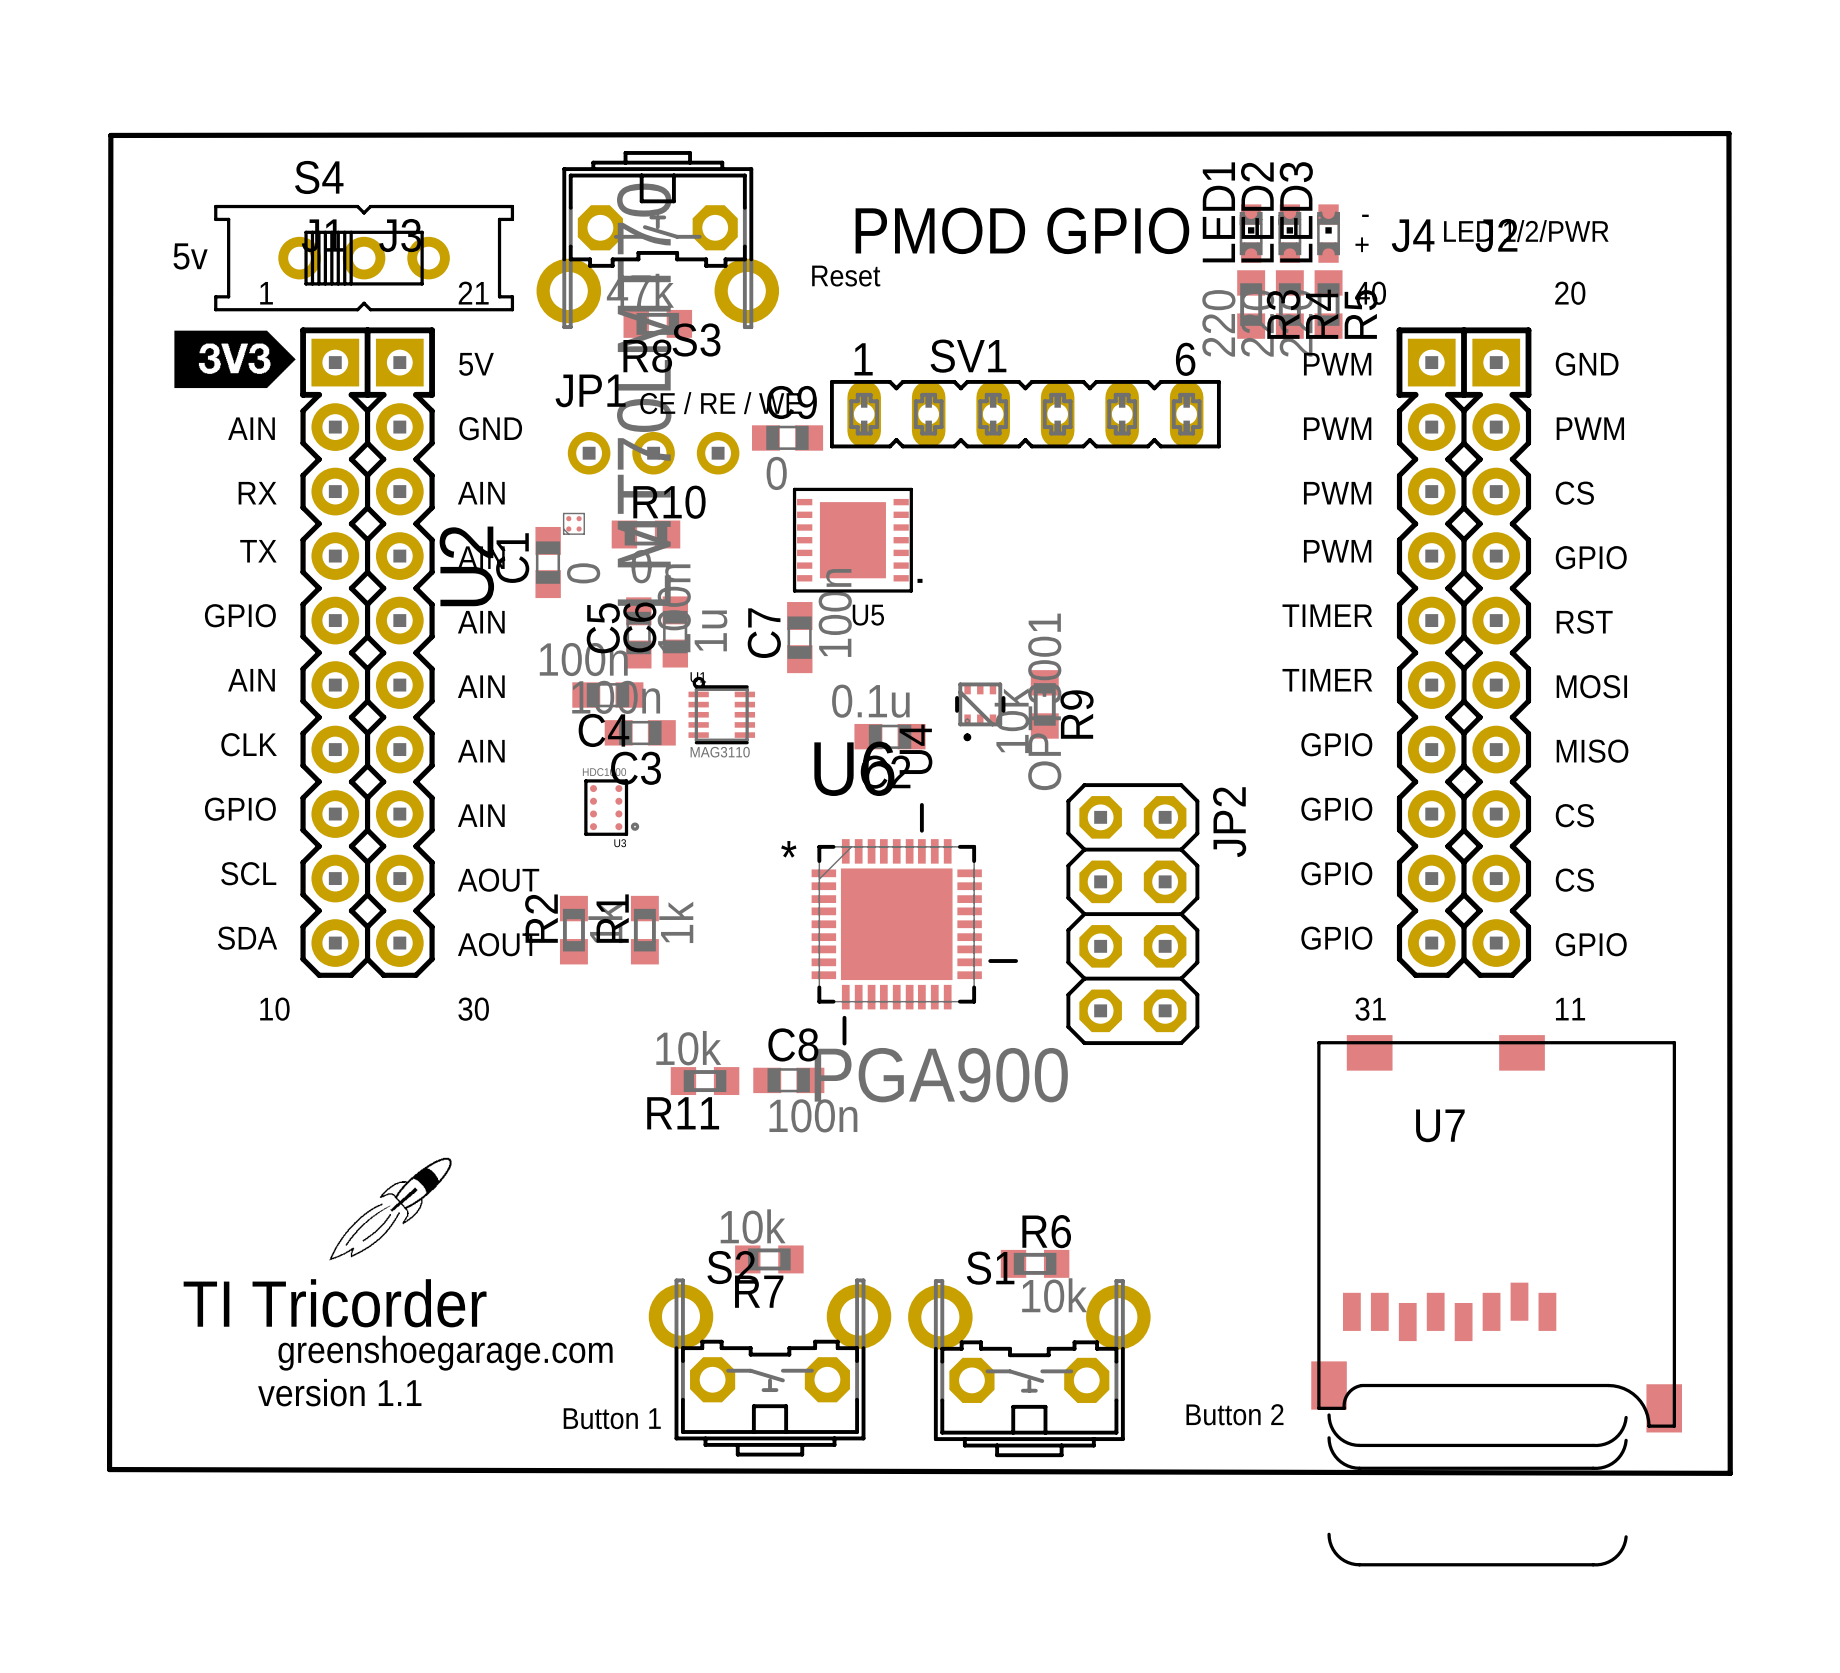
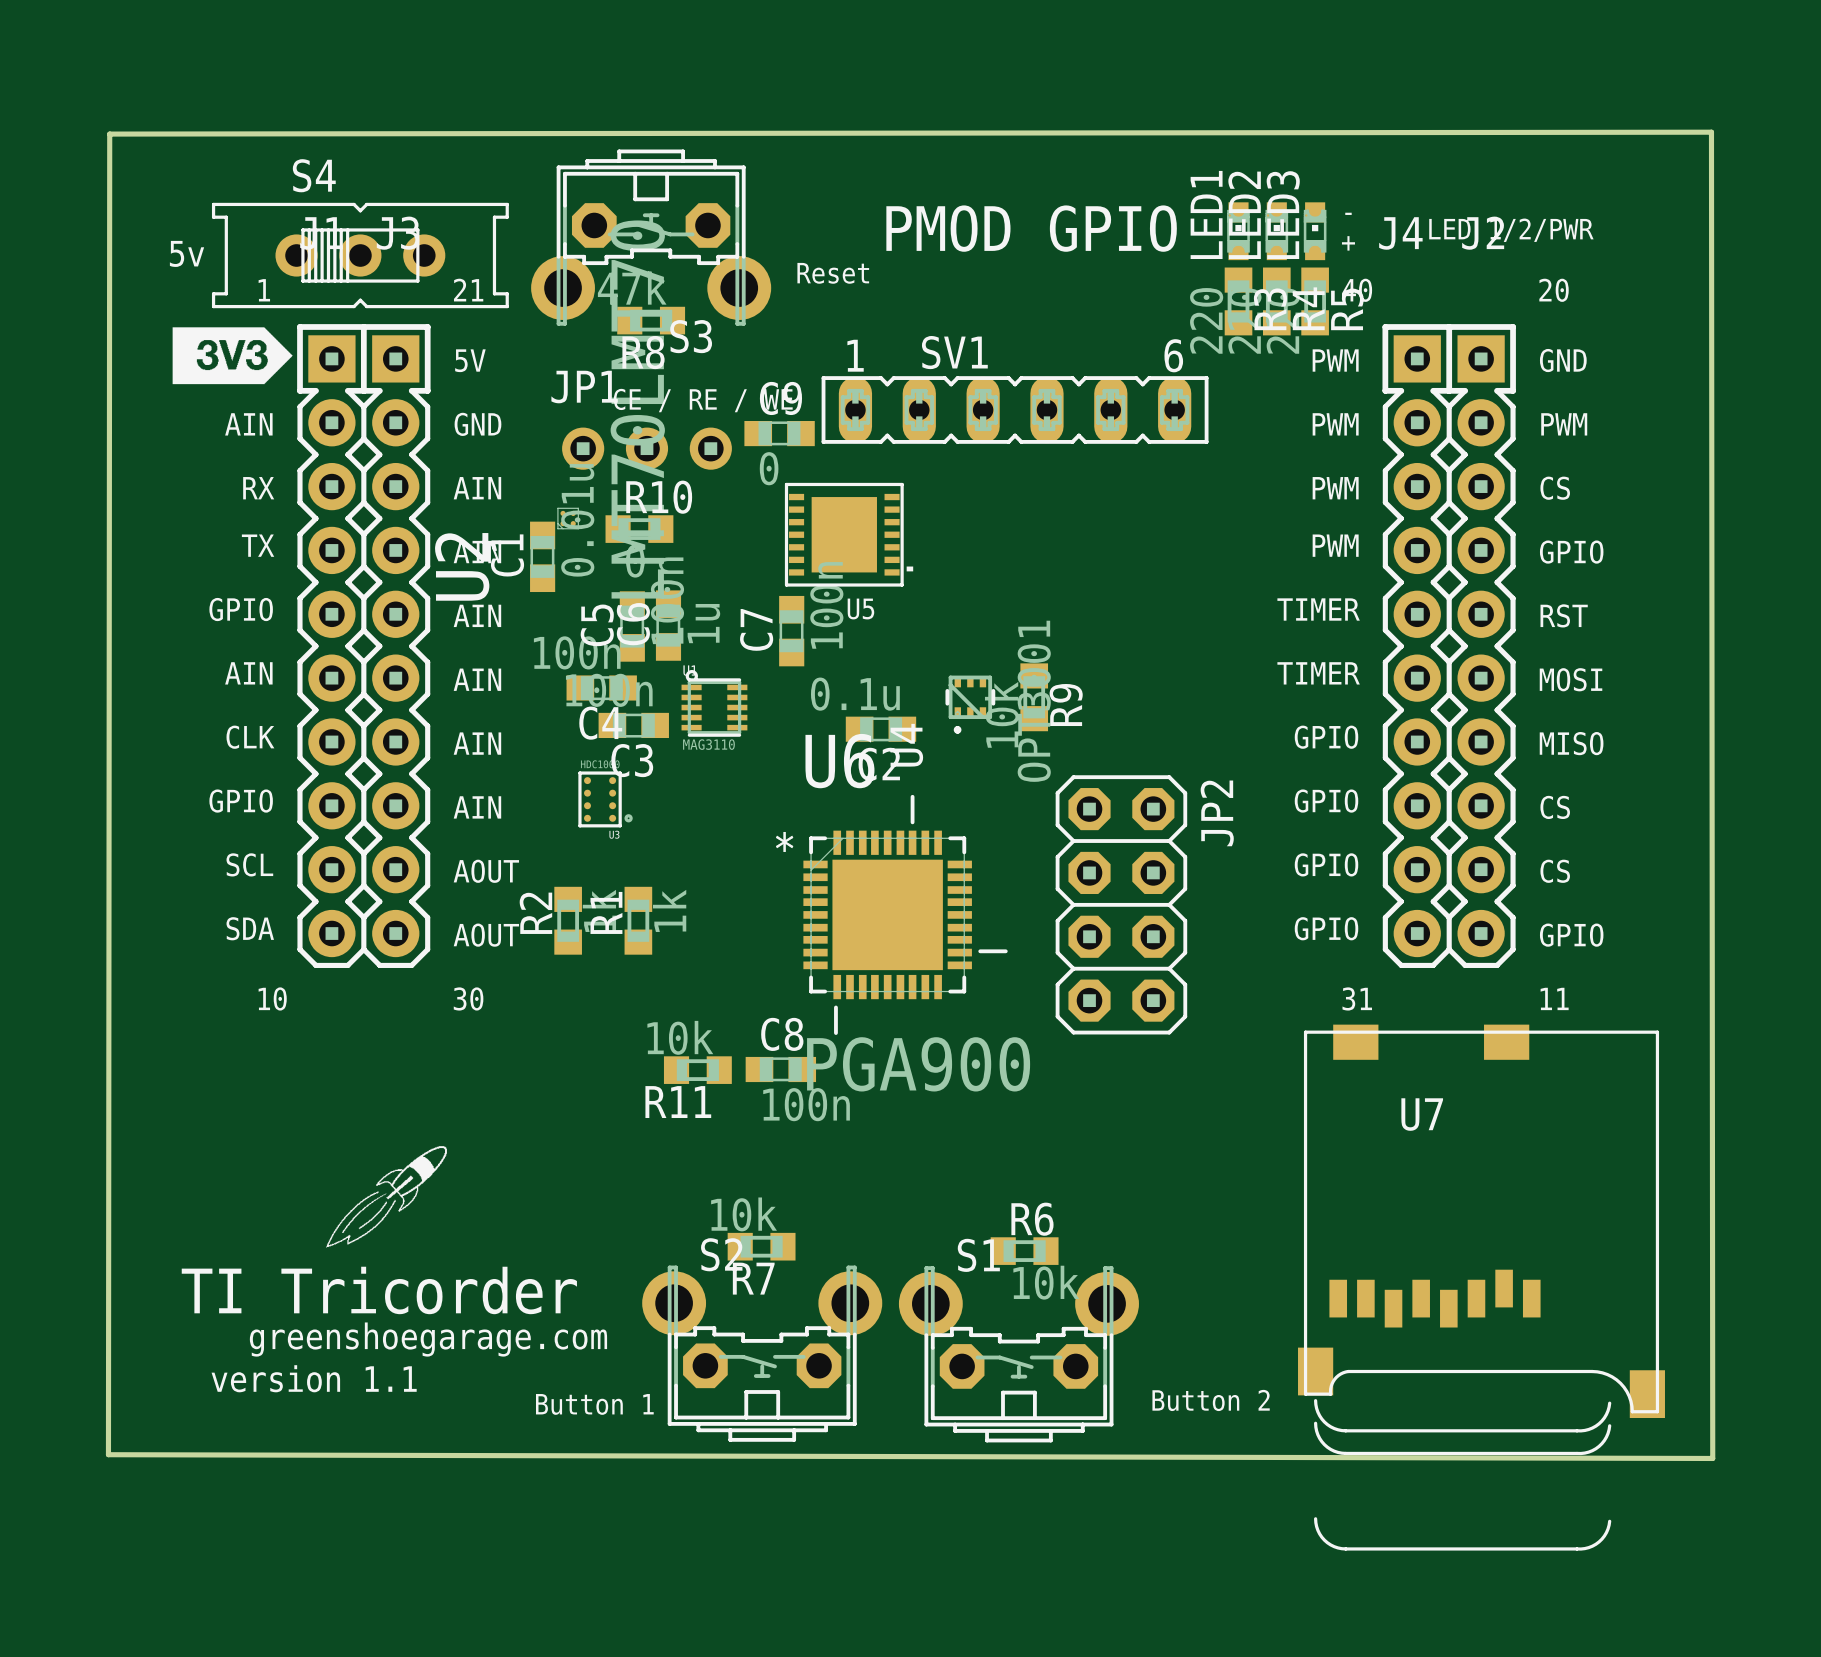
C1 value: 0 (583, 573) -> 0.01u (577, 520)

